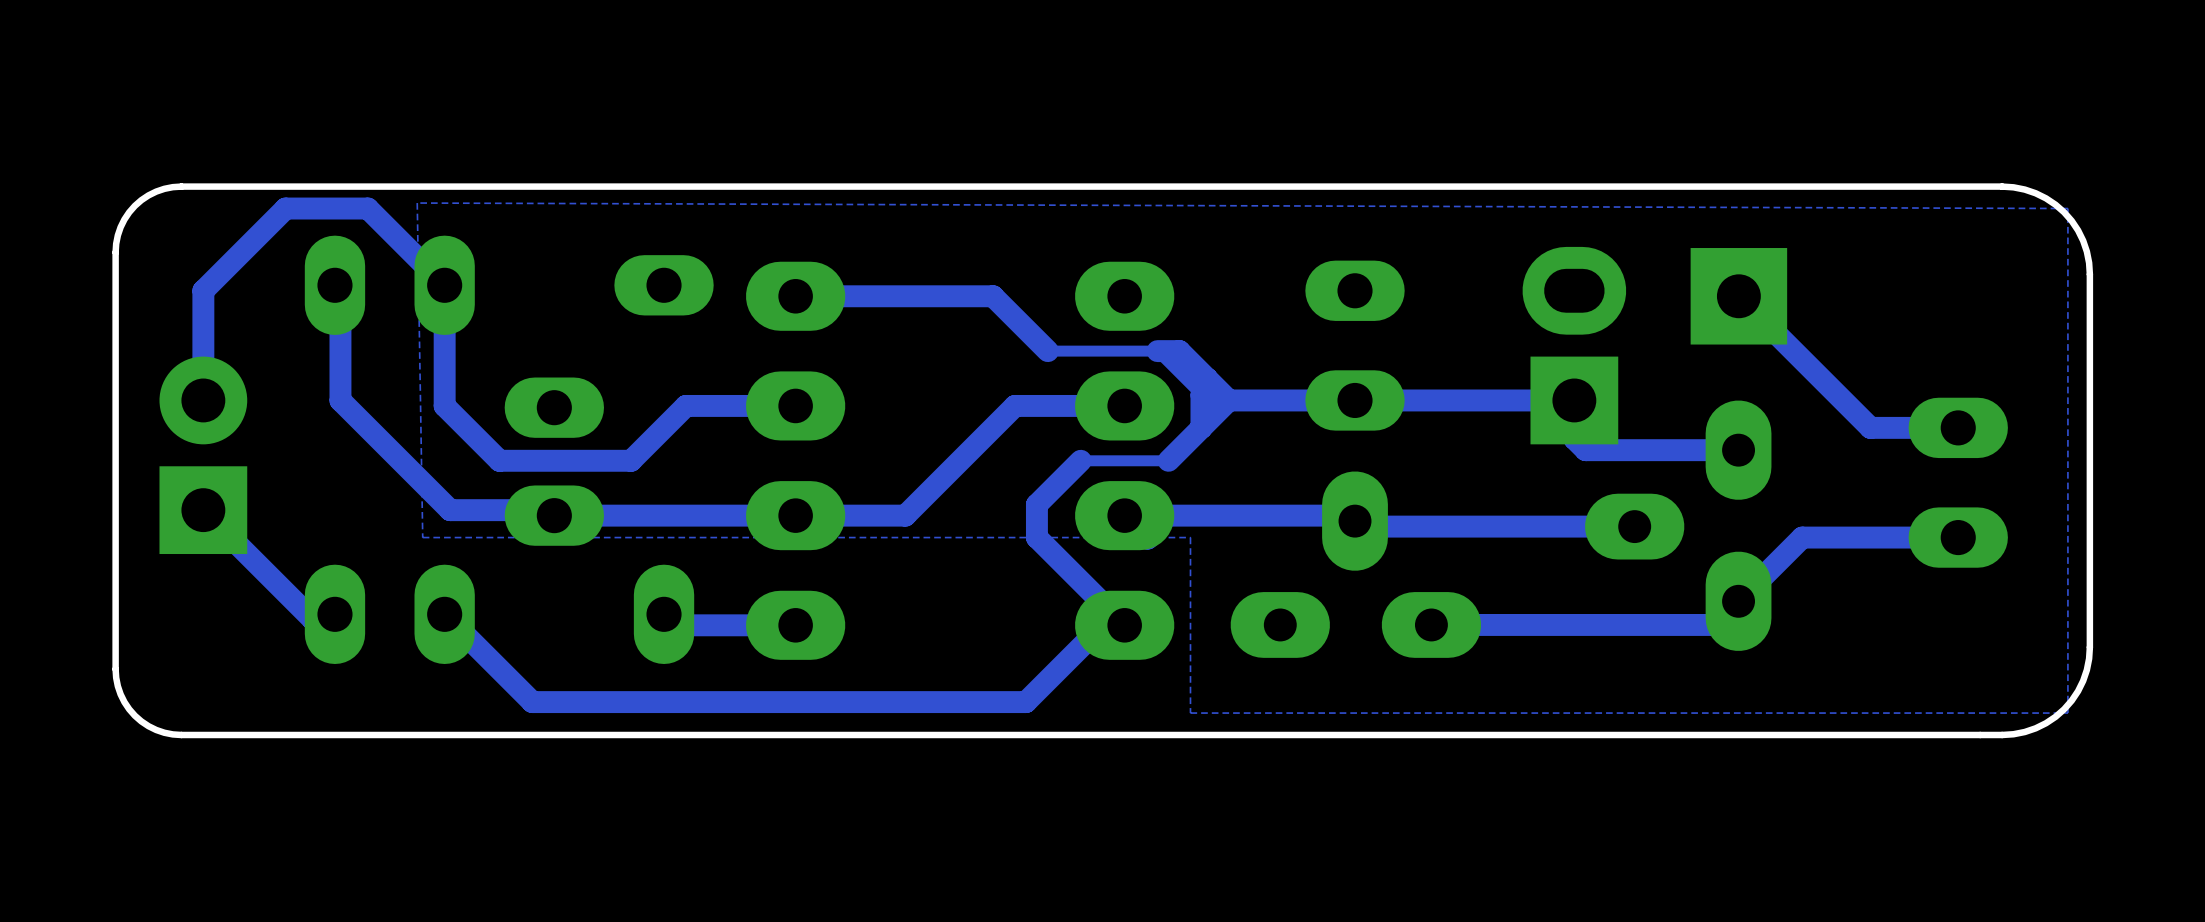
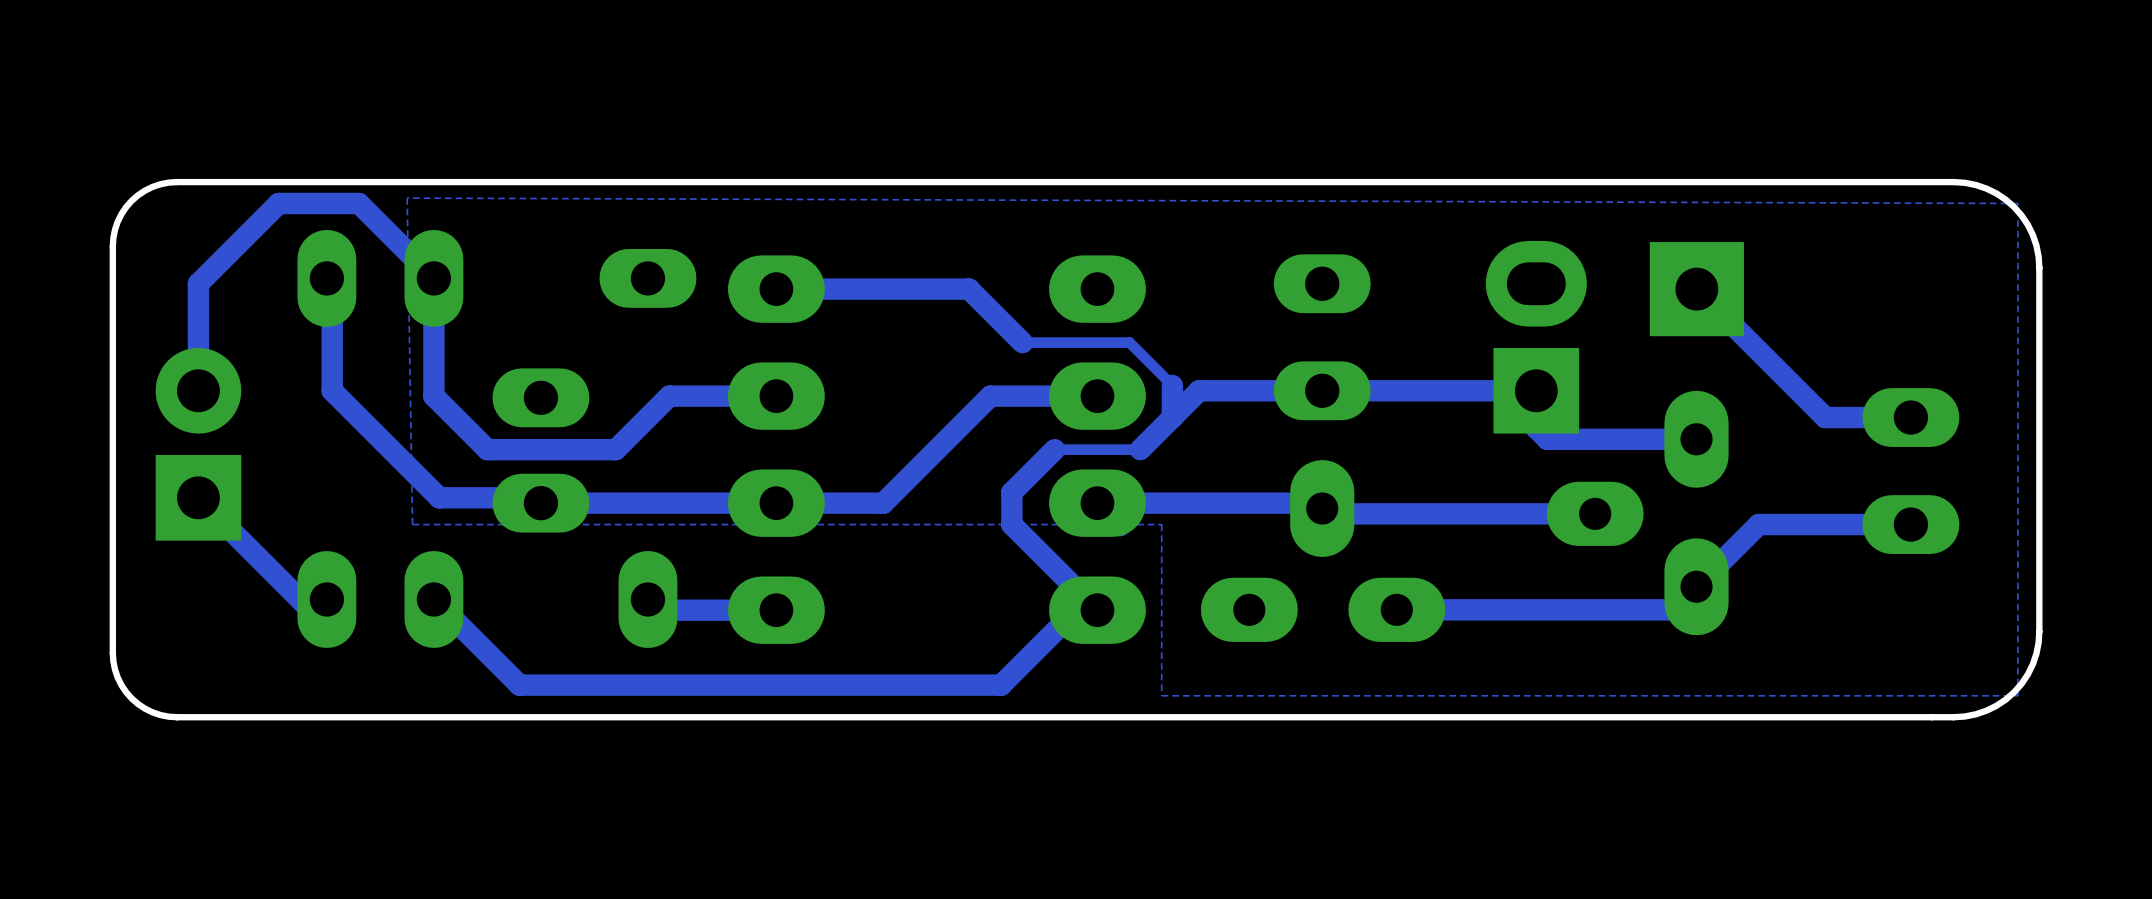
track: (1157, 351) (1179, 351) (1228, 400) (1206, 400) (1201, 394) -> none

